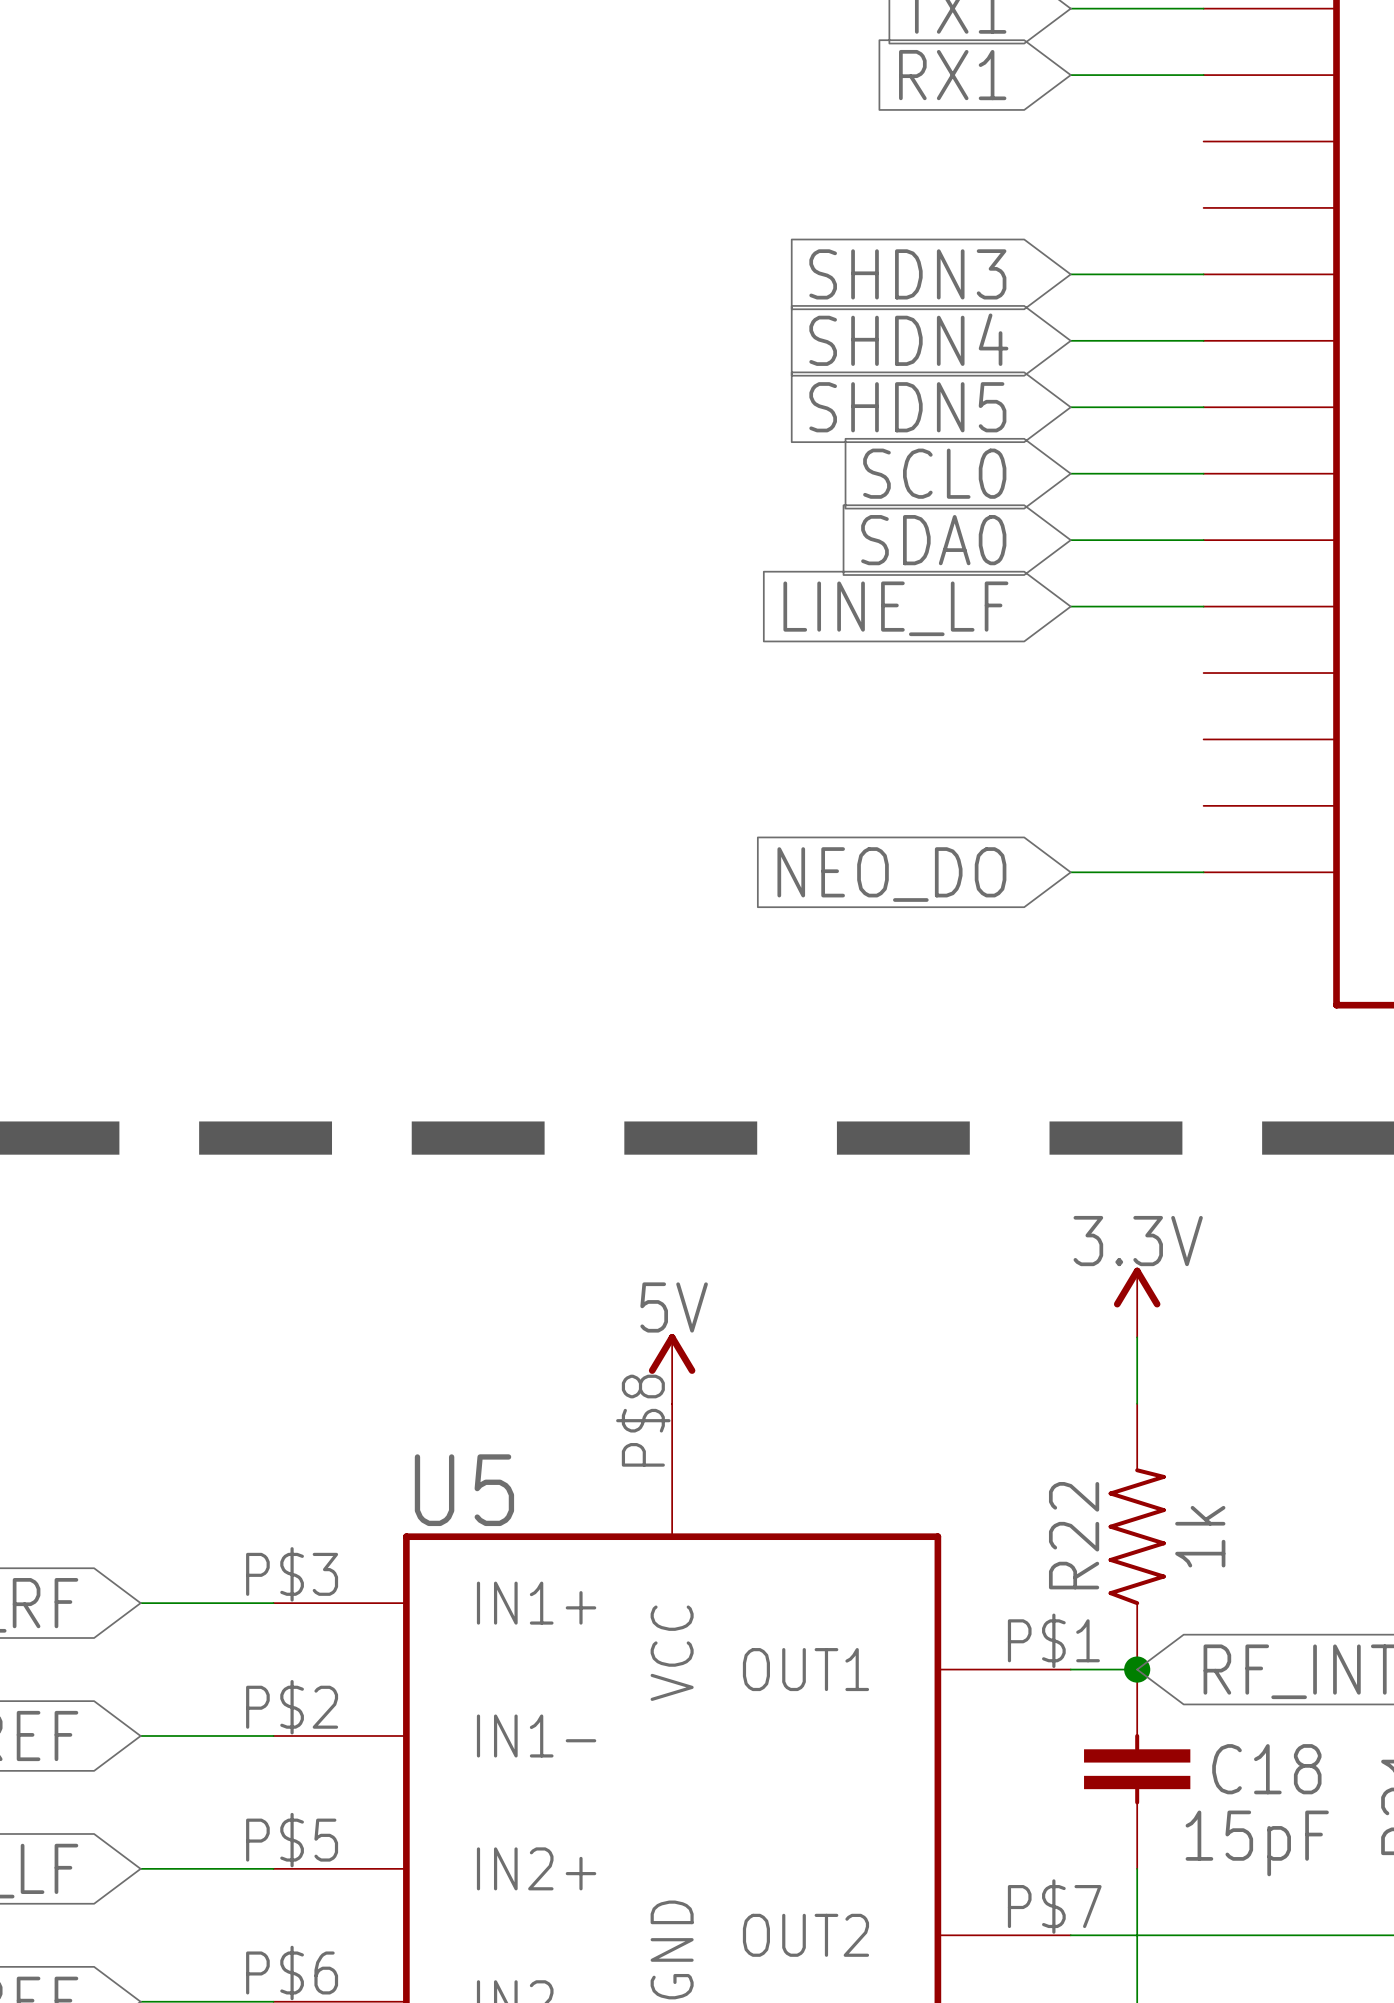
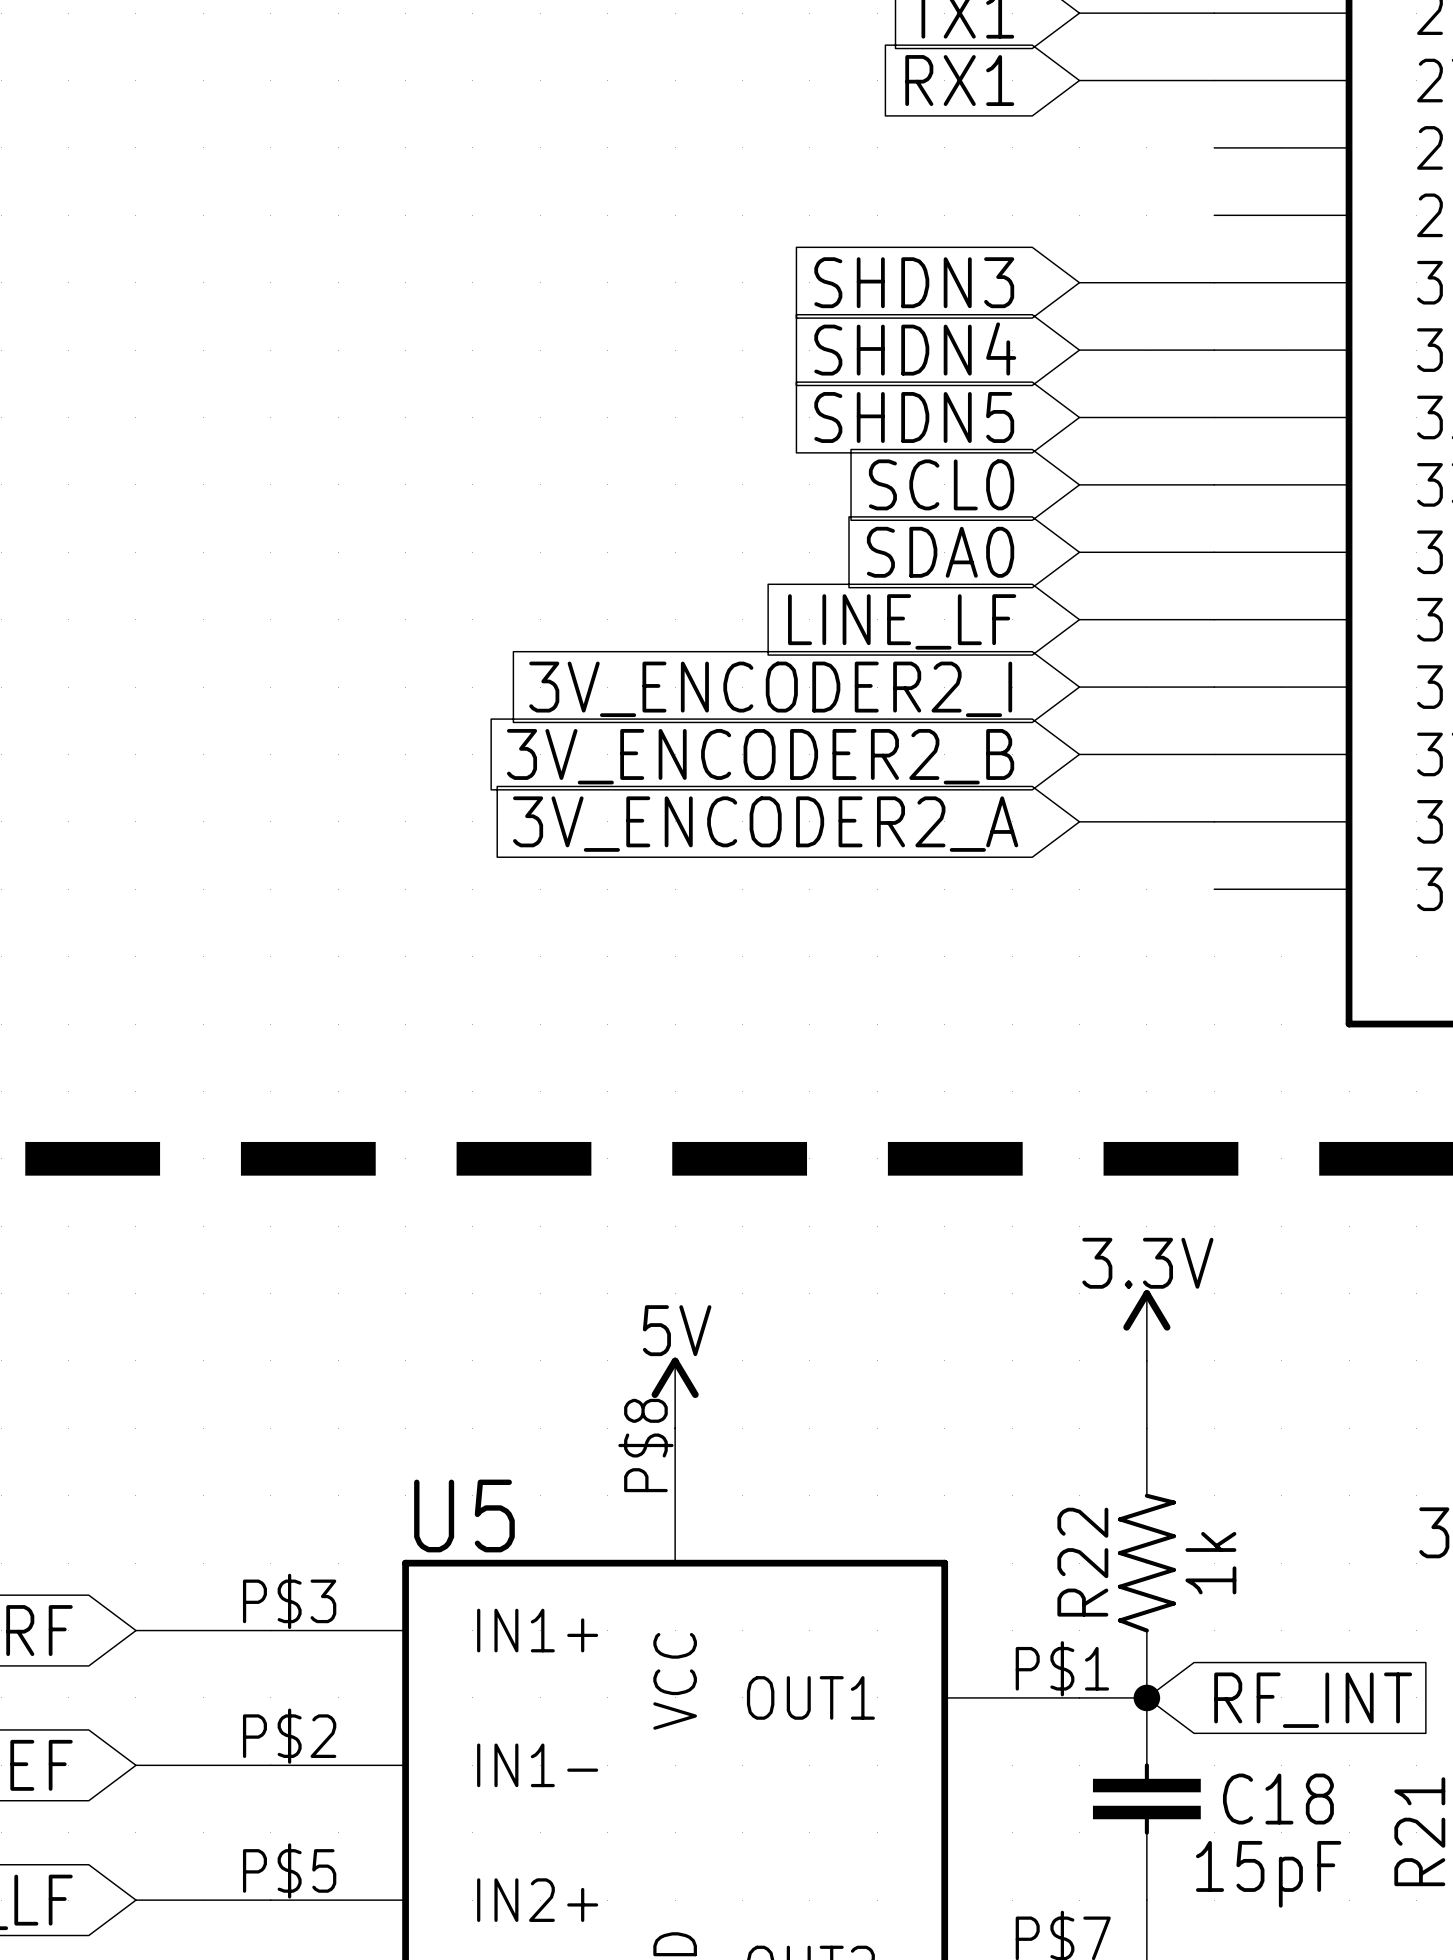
wire: none -> (1079, 687) (1214, 687)
global label: none -> 3V_ENCODER2_I (770, 689)
wire: none -> (1079, 754) (1214, 754)
global label: none -> 3V_ENCODER2_B (760, 756)
global label: none -> 3V_ENCODER2_A (765, 824)
wire: (1070, 872) (1203, 872) -> (1079, 821) (1214, 821)
global label: NEO_DO (891, 874) -> none

